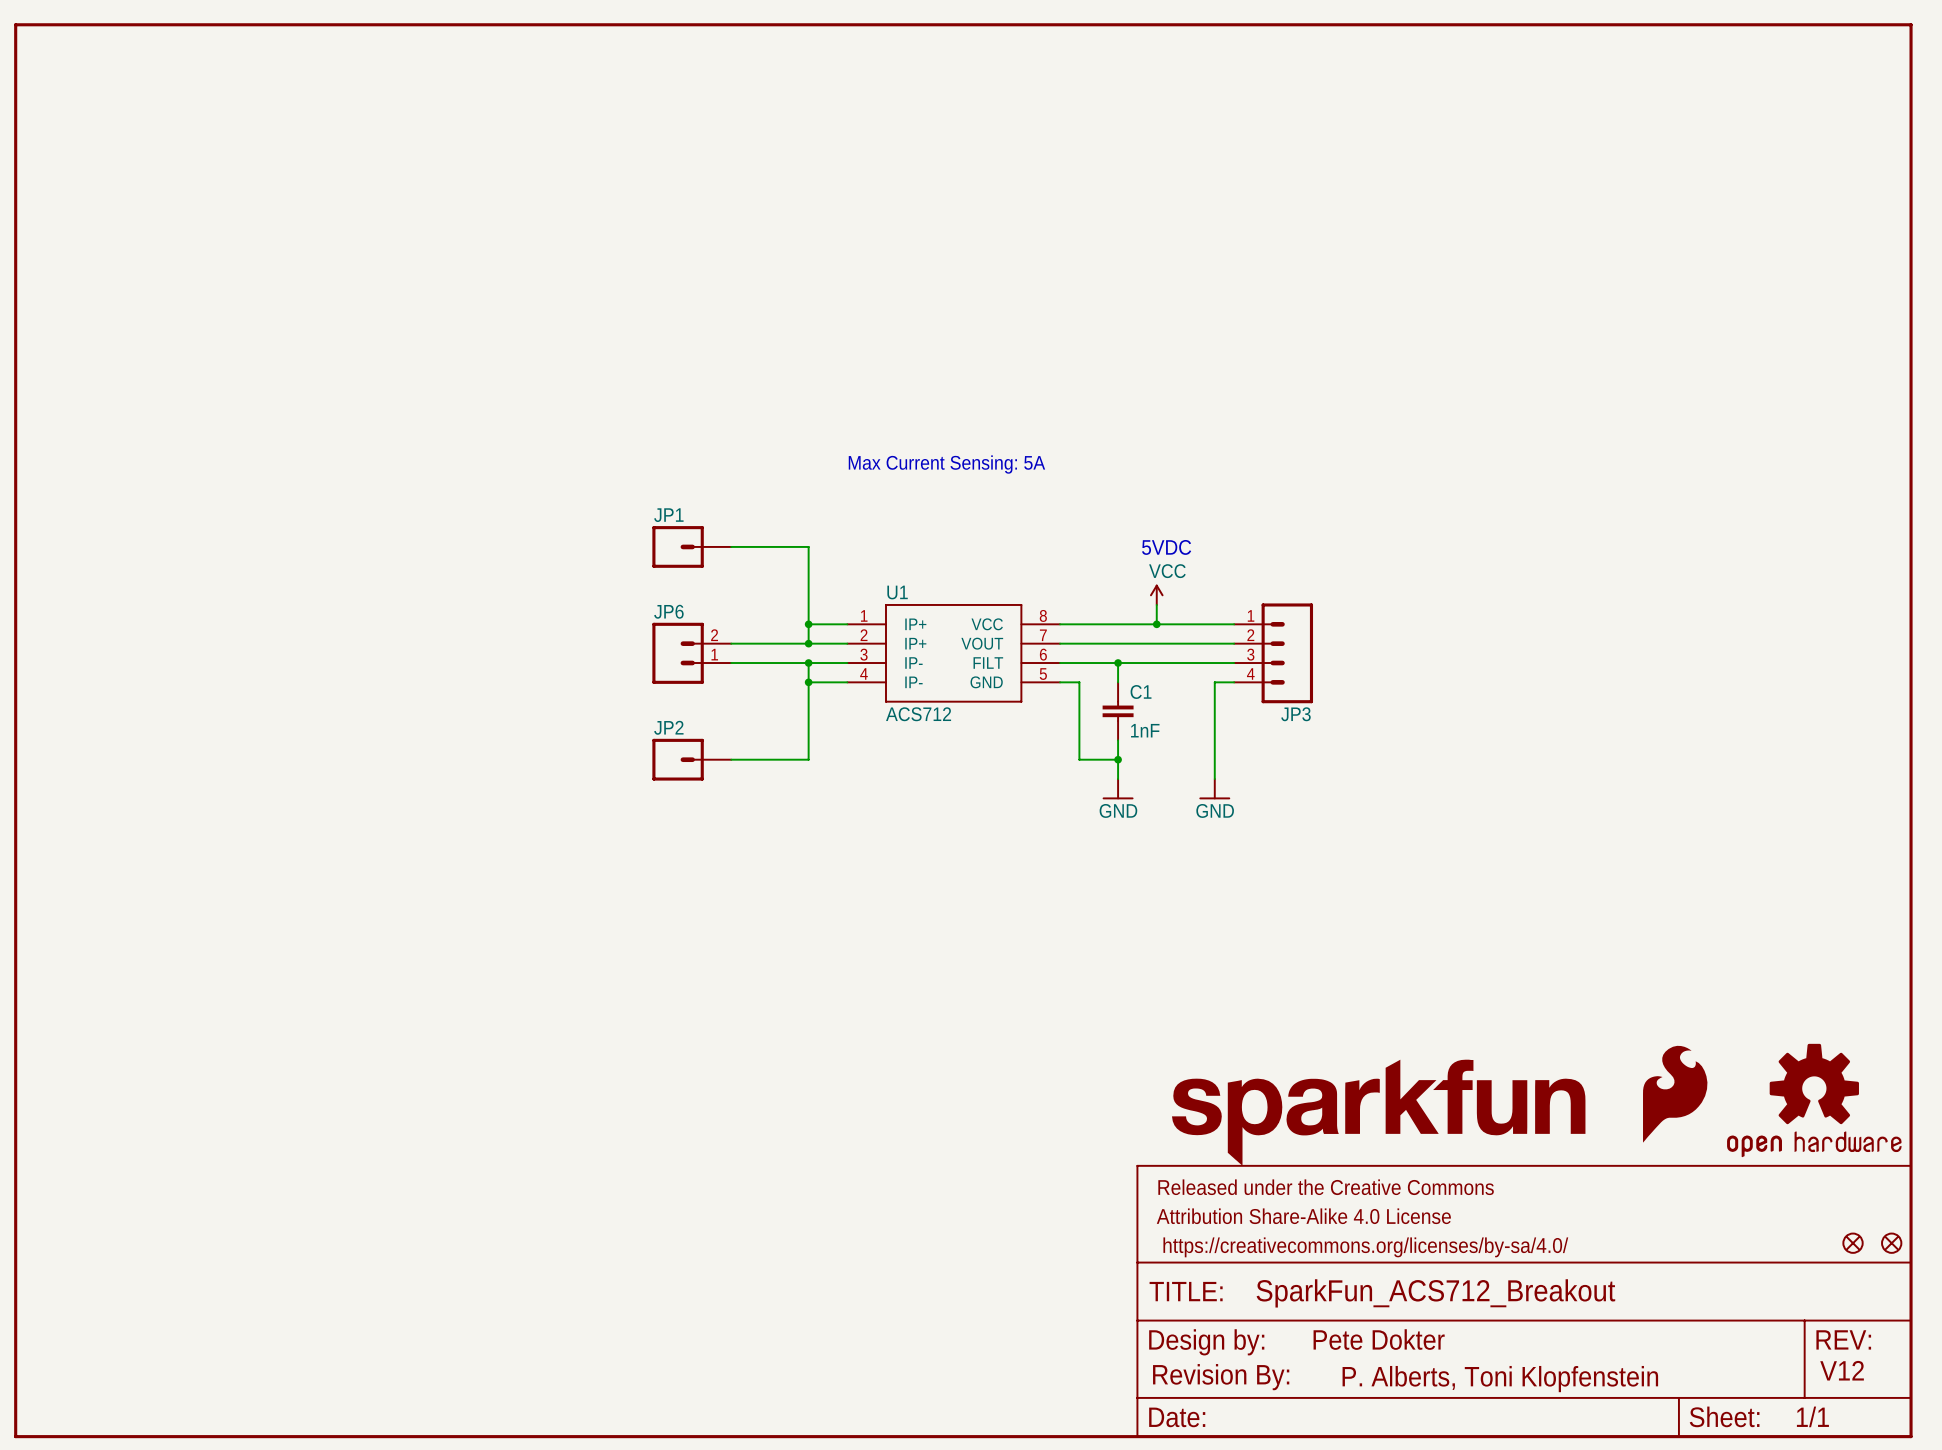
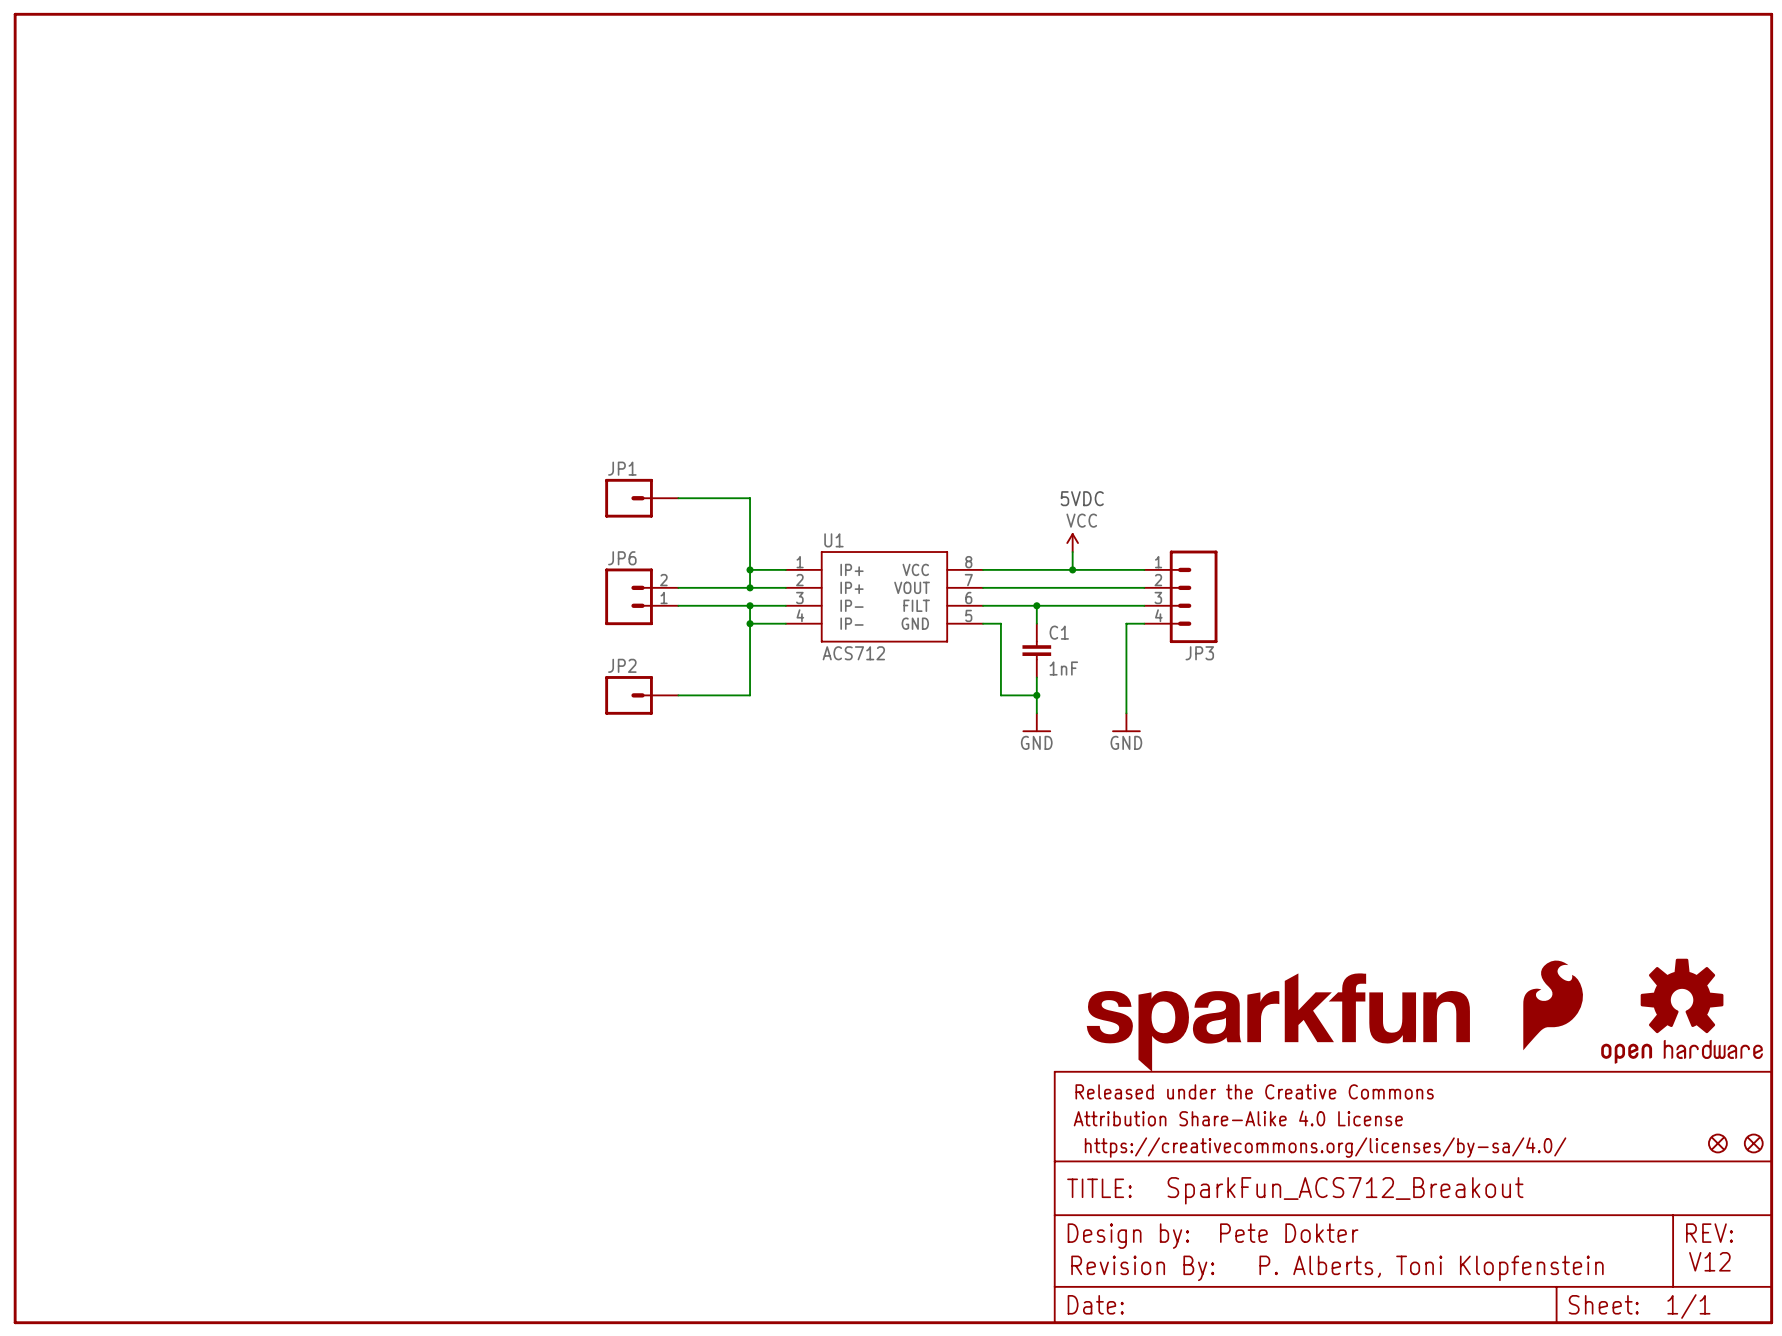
text: Max Current Sensing: 5A (946, 464) -> none
text position: P. Alberts, Toni Klopfenstein (1500, 1379) -> P. Alberts, Toni Klopfenstein (1431, 1268)

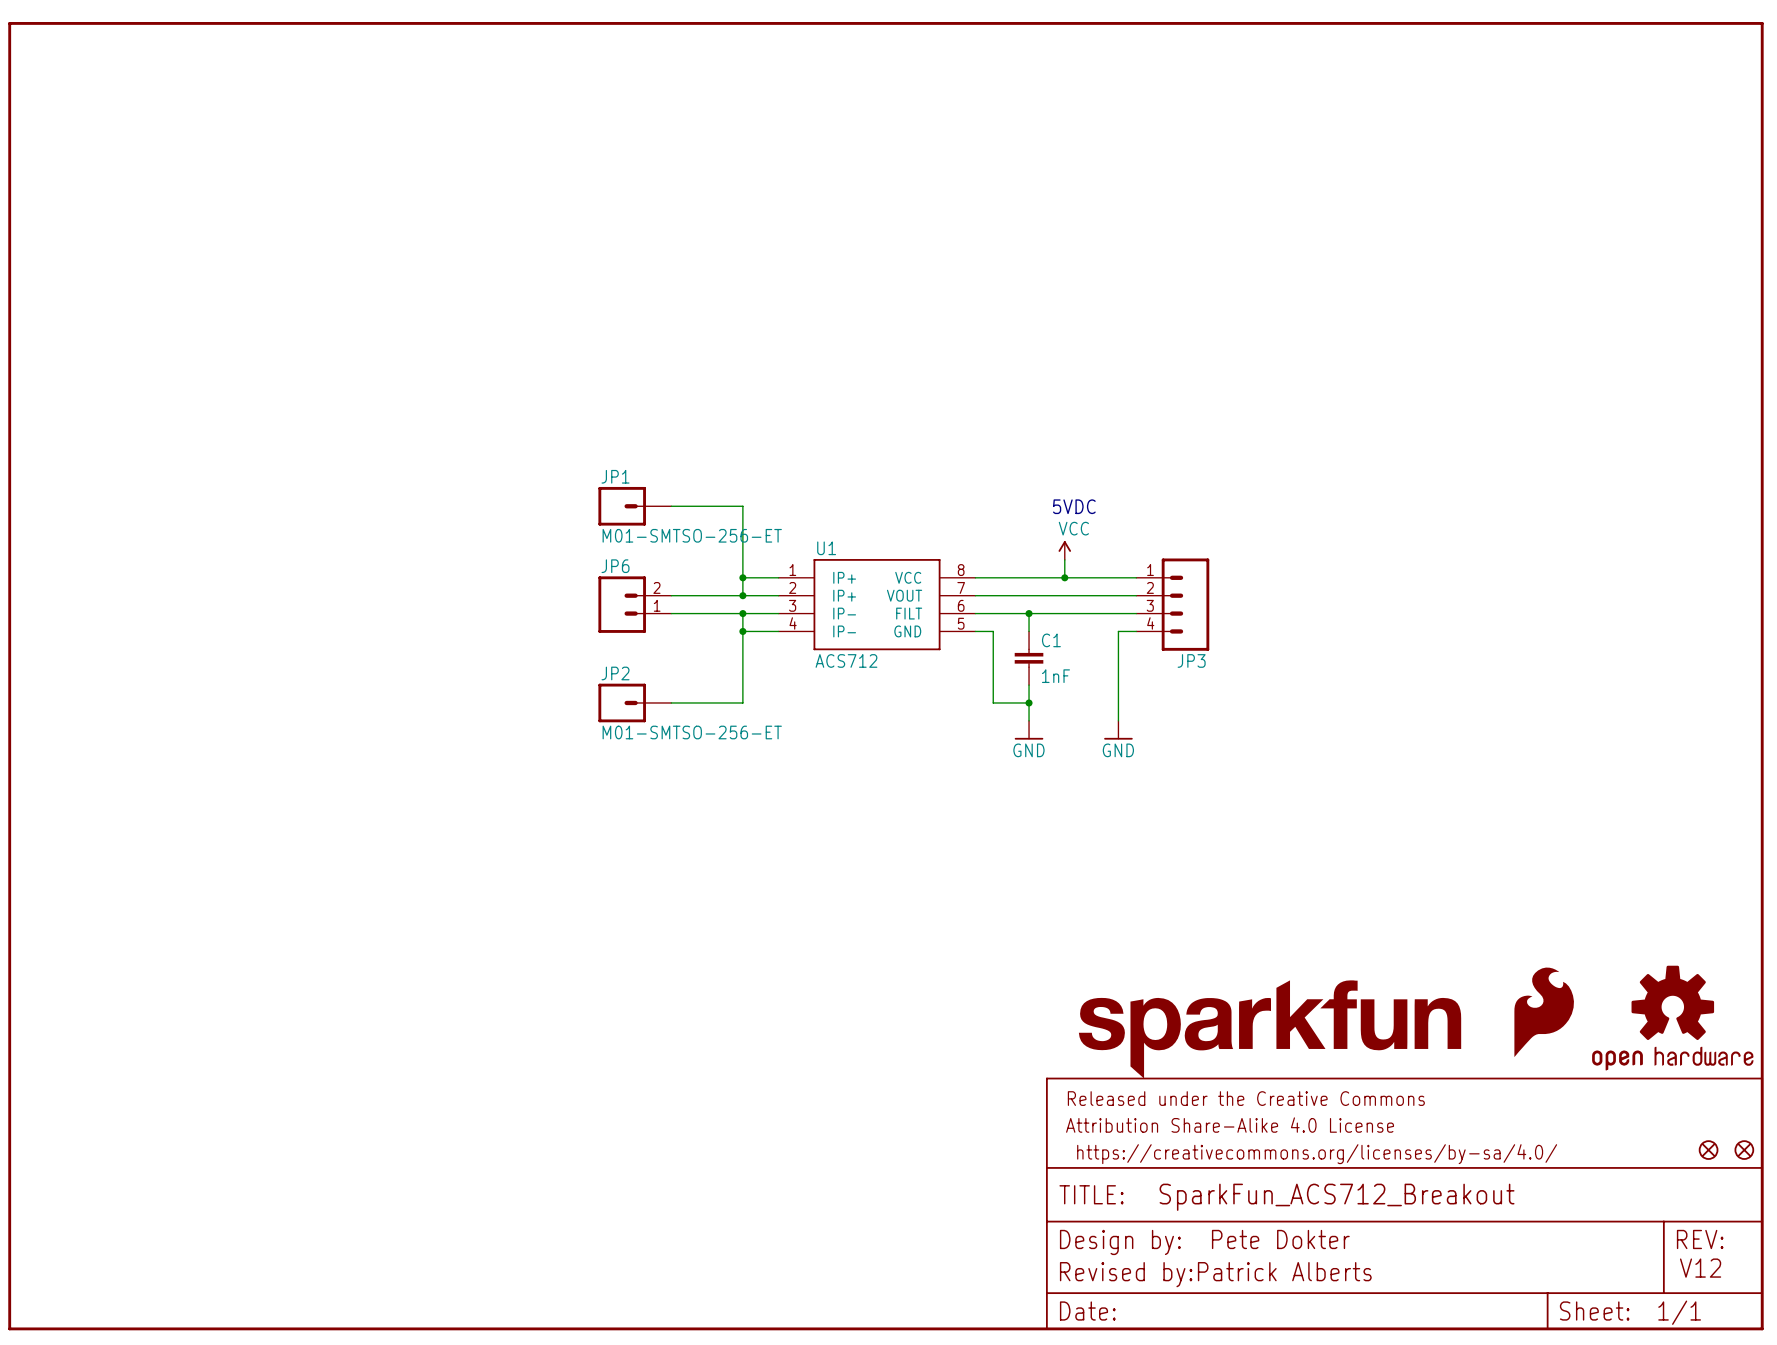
JP1 value: none -> M01-SMTSO-256-ET (692, 535)
JP2 value: none -> M01-SMTSO-256-ET (692, 732)
part: (1142, 1268) -> none
text: none -> Revised by:Patrick Alberts (1215, 1274)
text: P. Alberts, Toni Klopfenstein (1431, 1268) -> none

